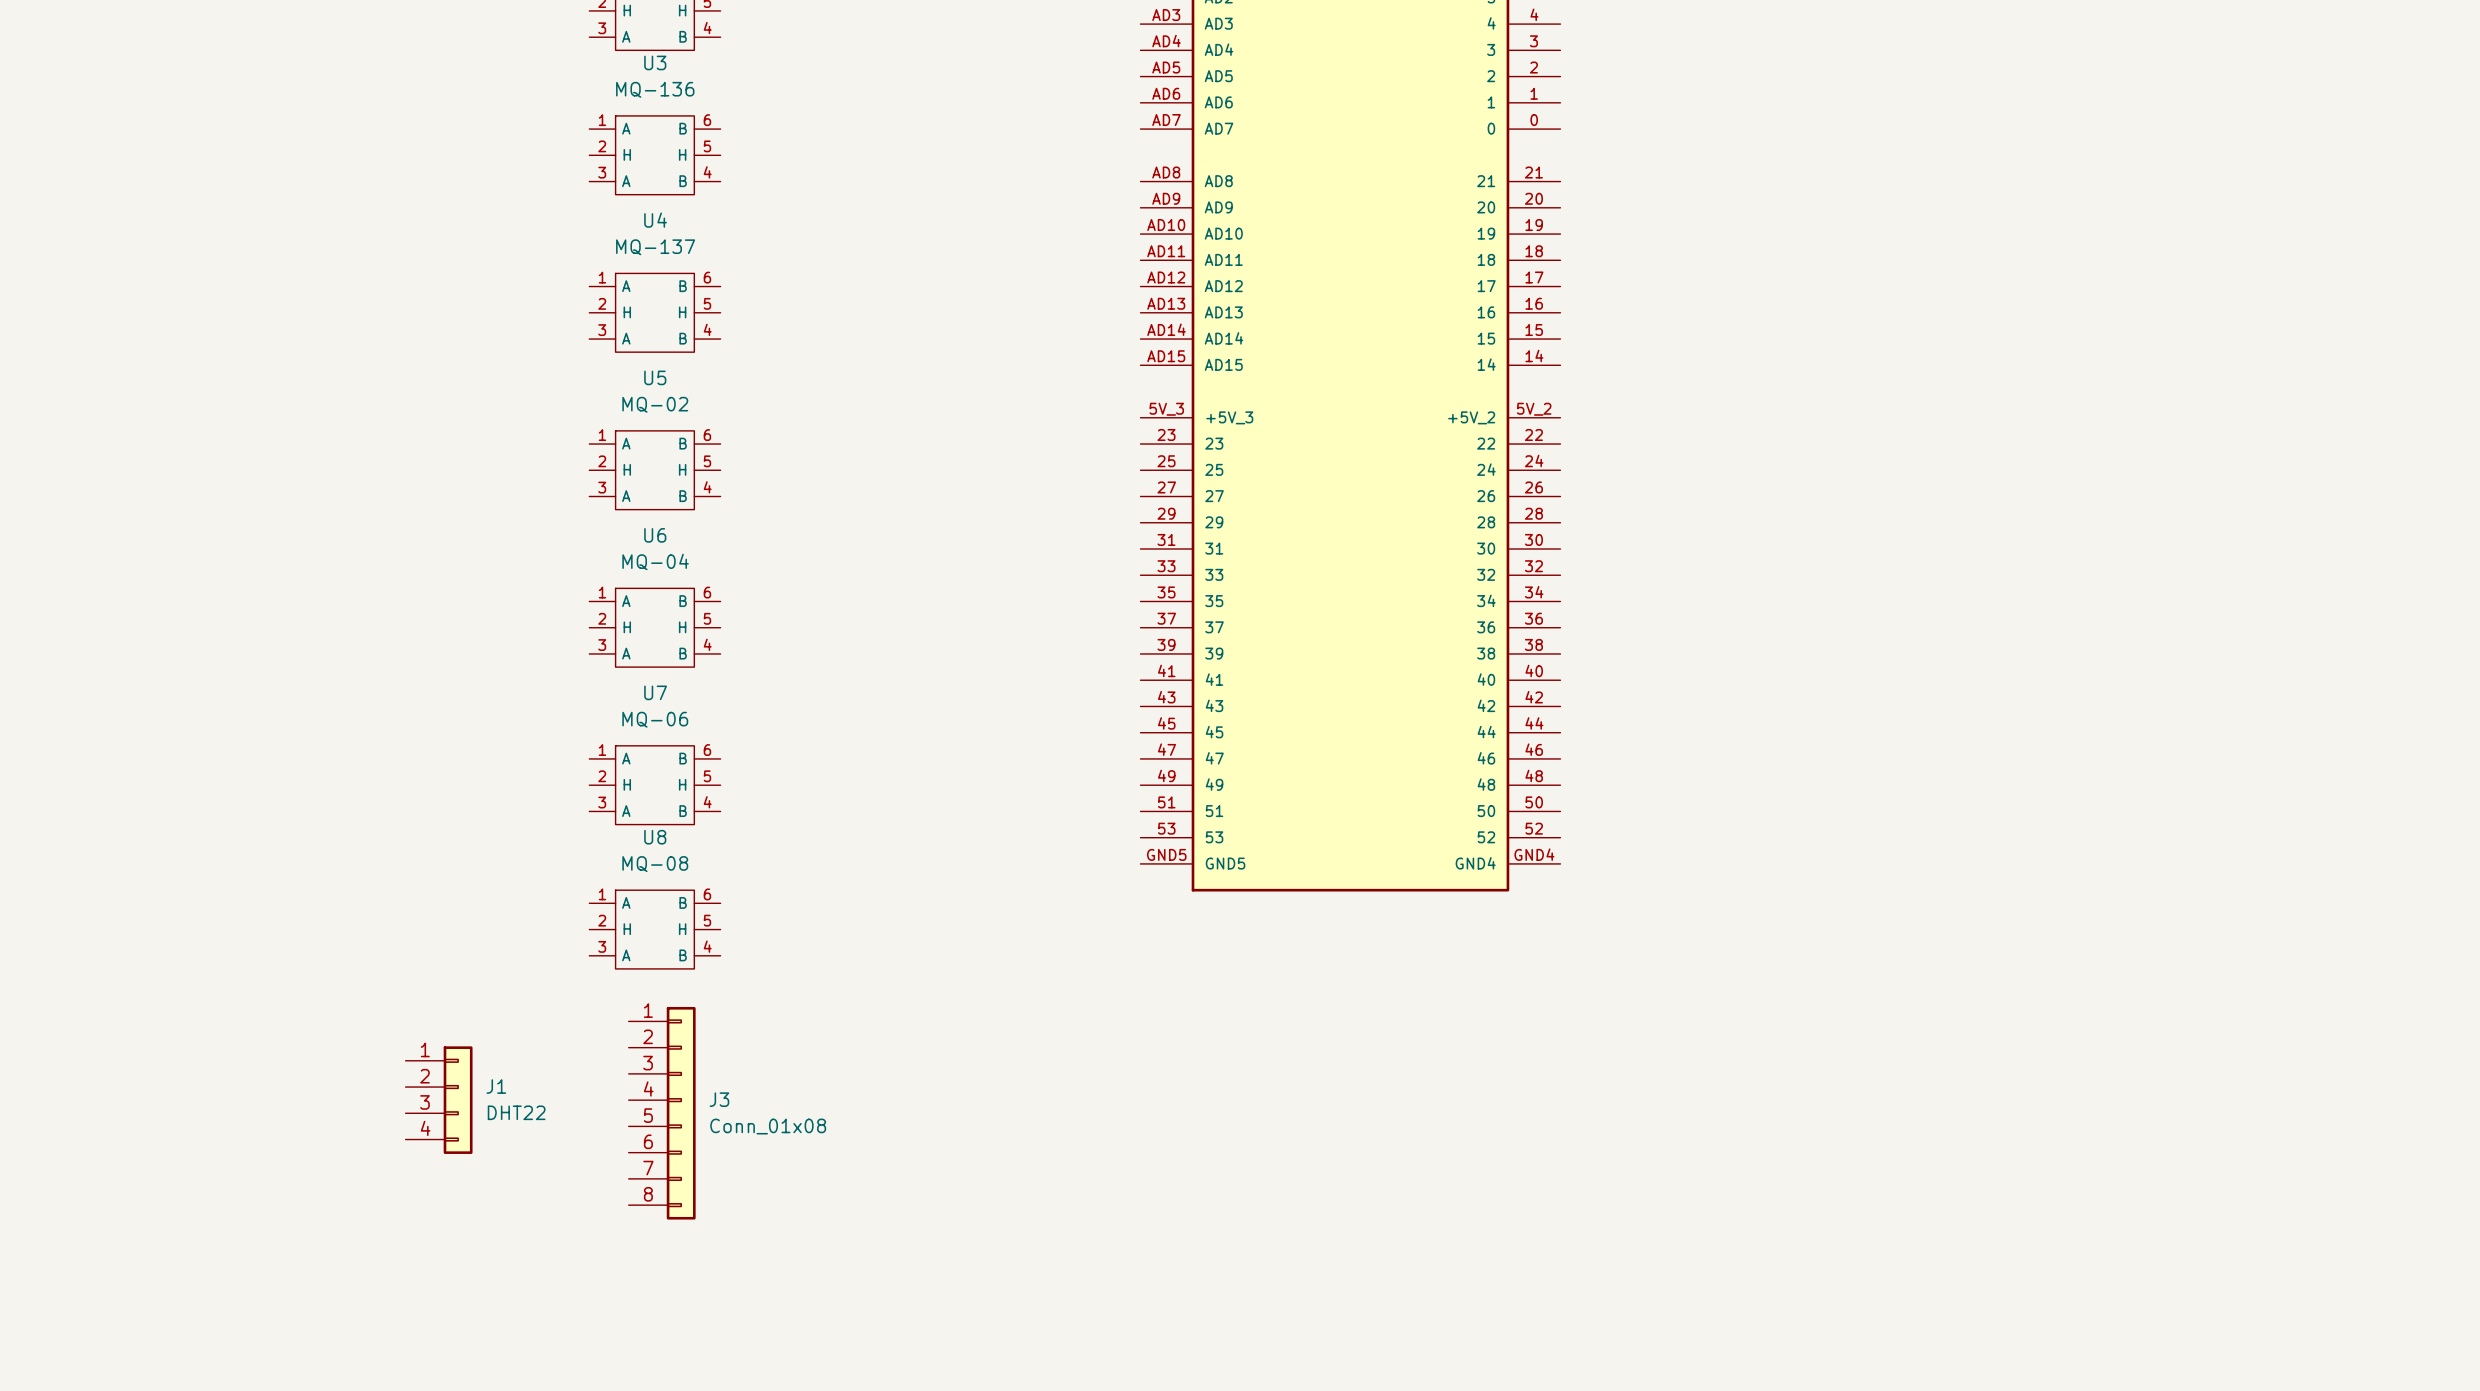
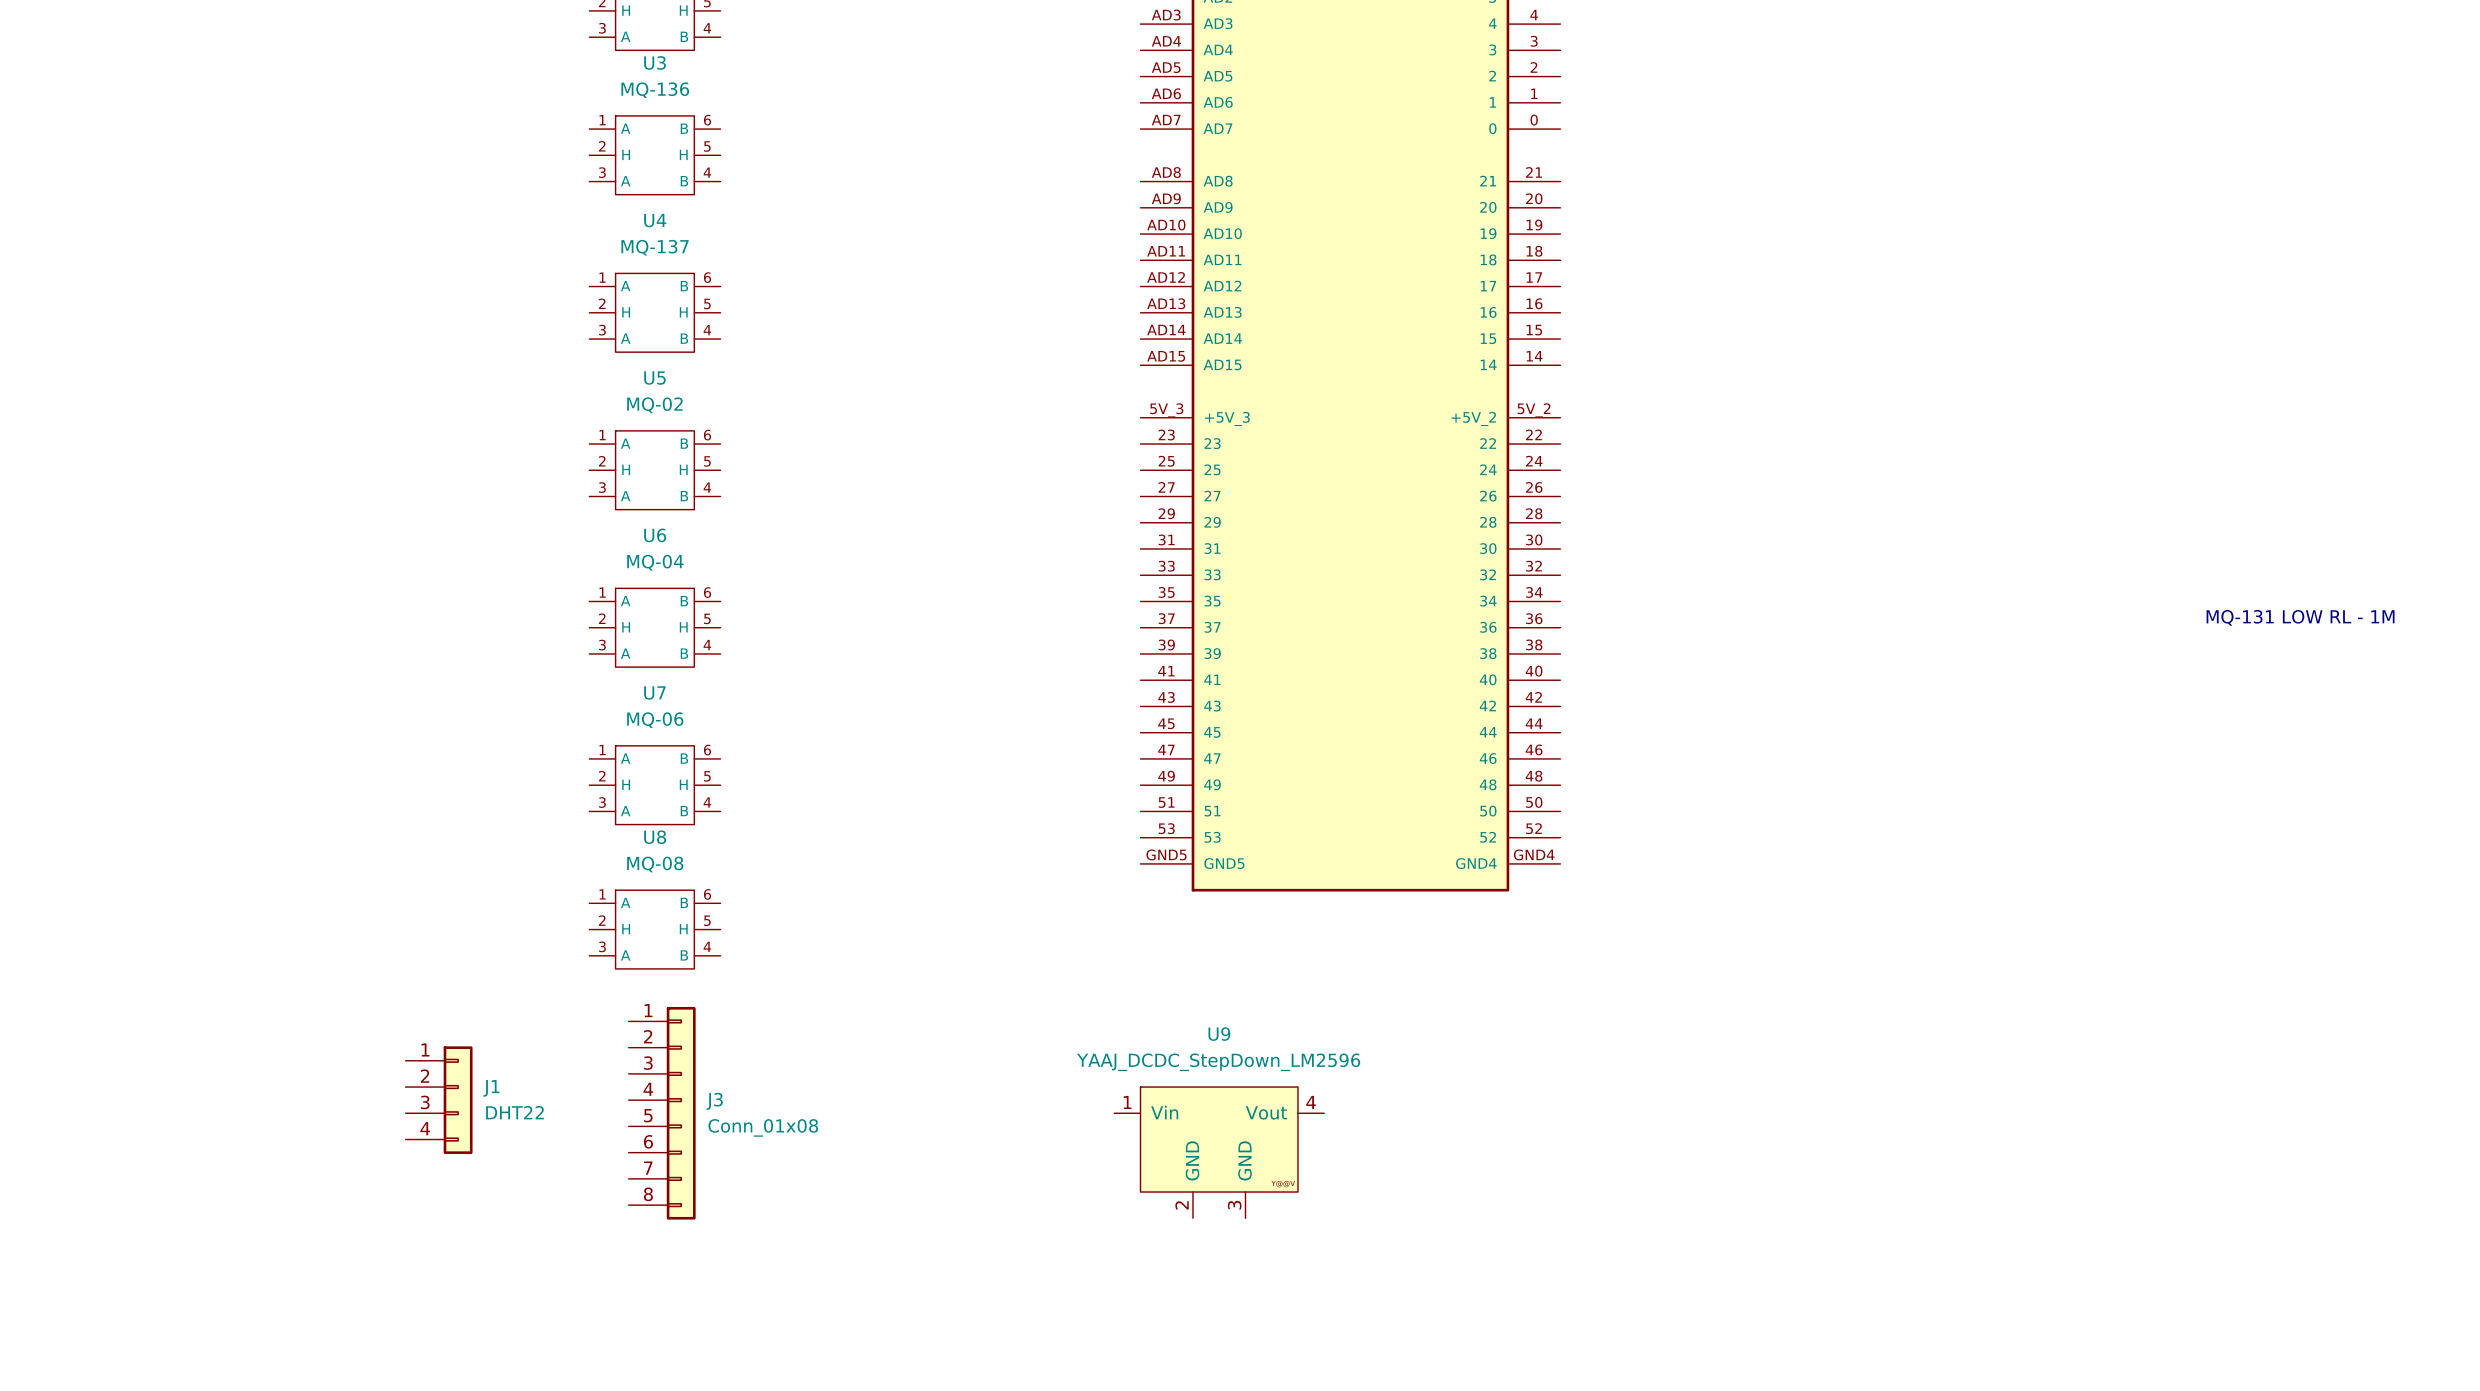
text: none -> MQ-131 LOW RL - 1M (2300, 617)
U9: none -> YAAJ_DCDC_StepDown_LM2596 (1219, 1152)

